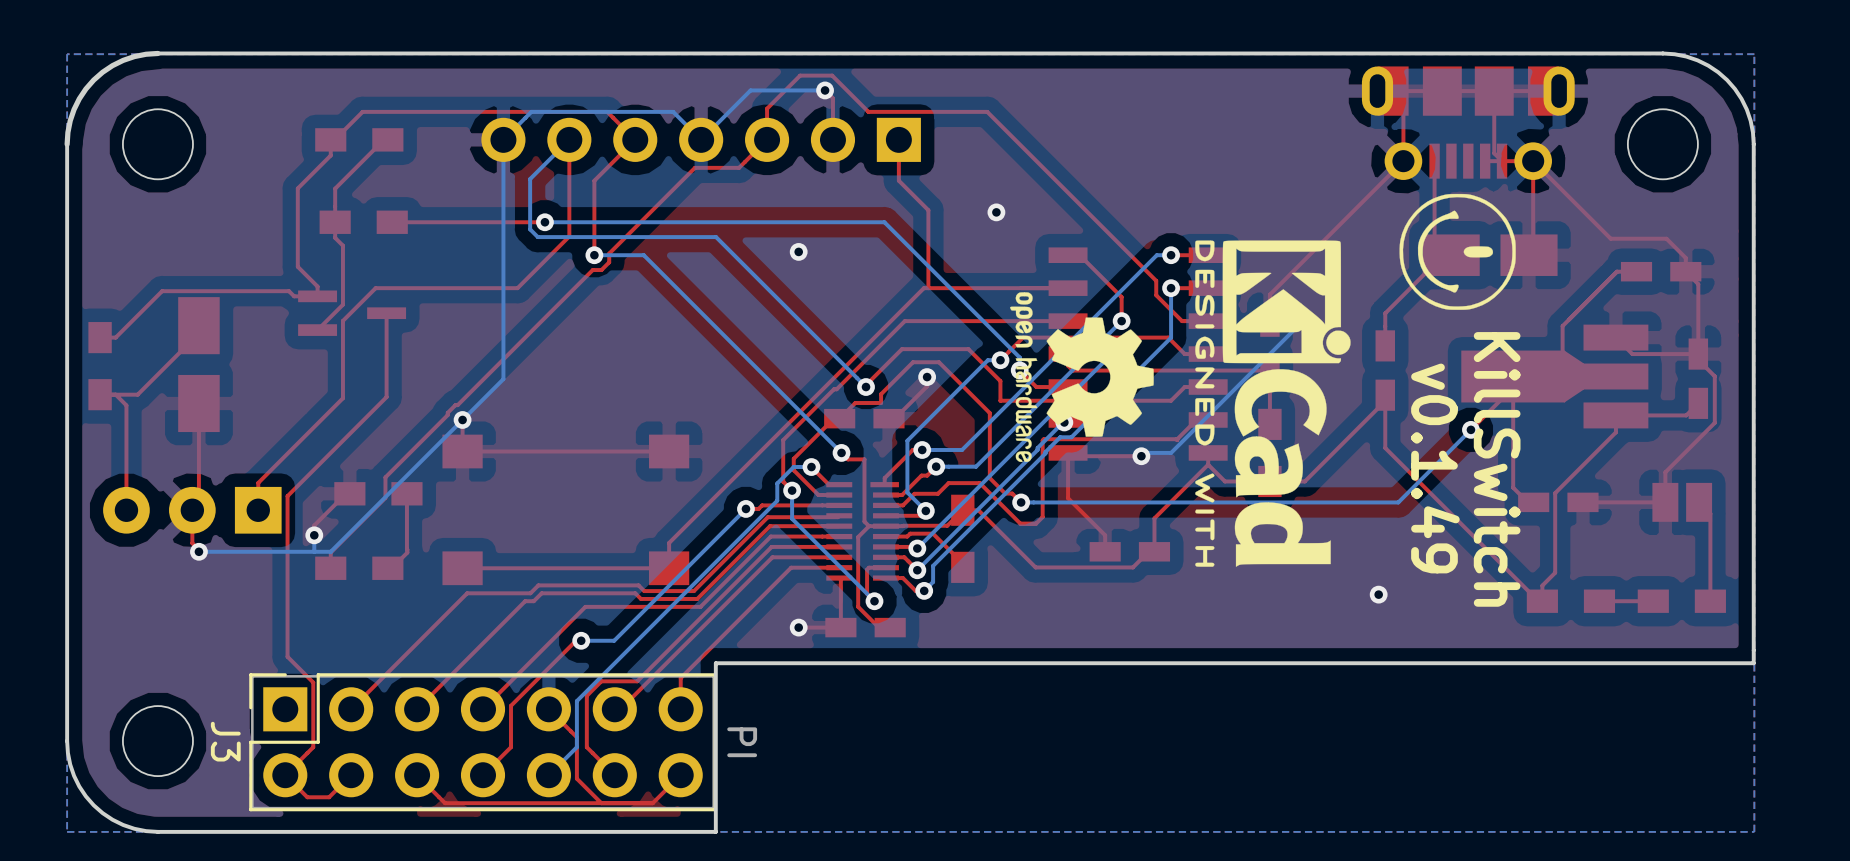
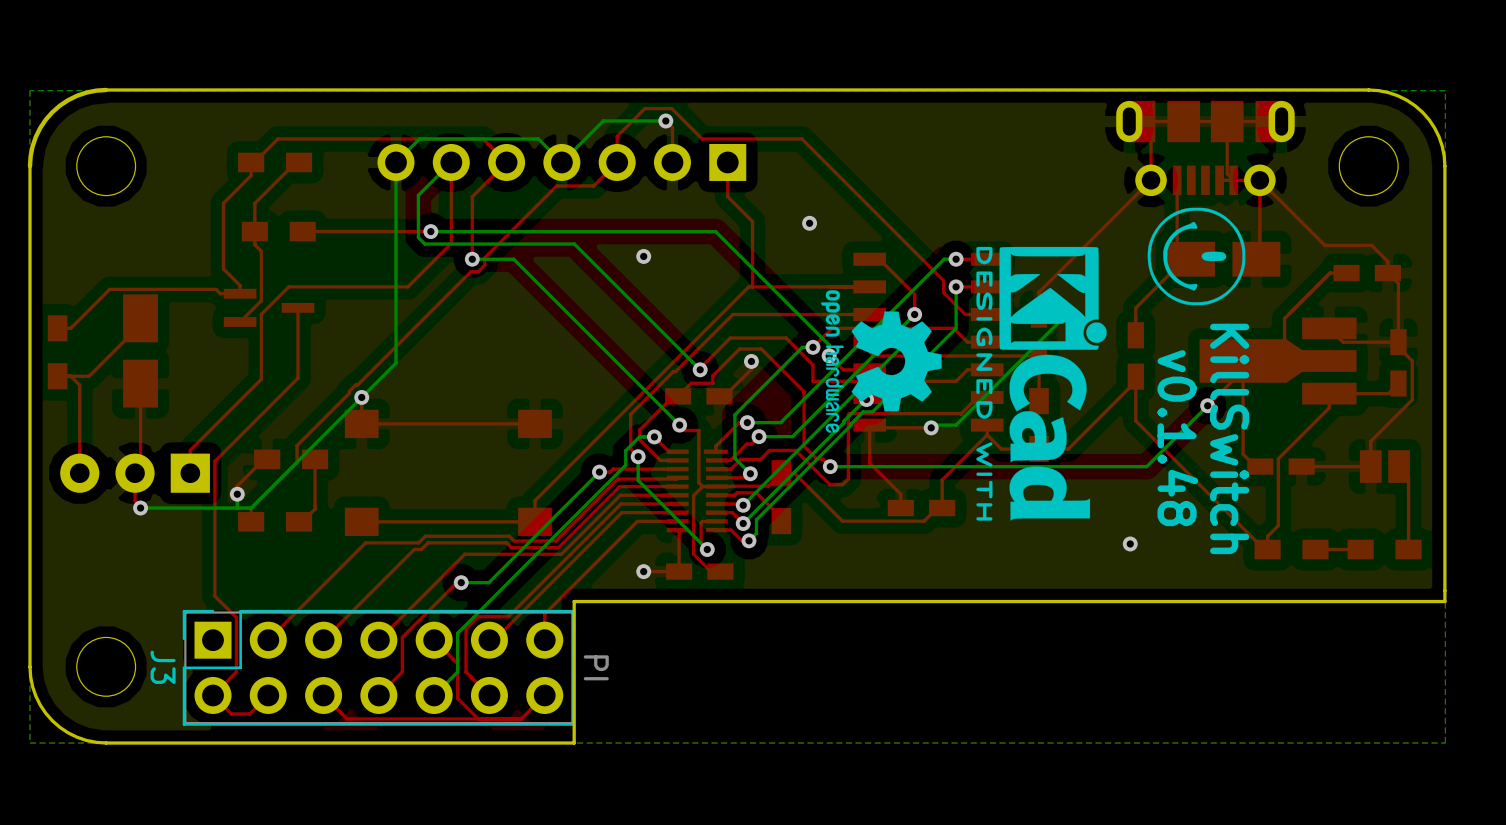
text: v0.1.49 (1435, 468) -> v0.1.48 (1177, 438)

